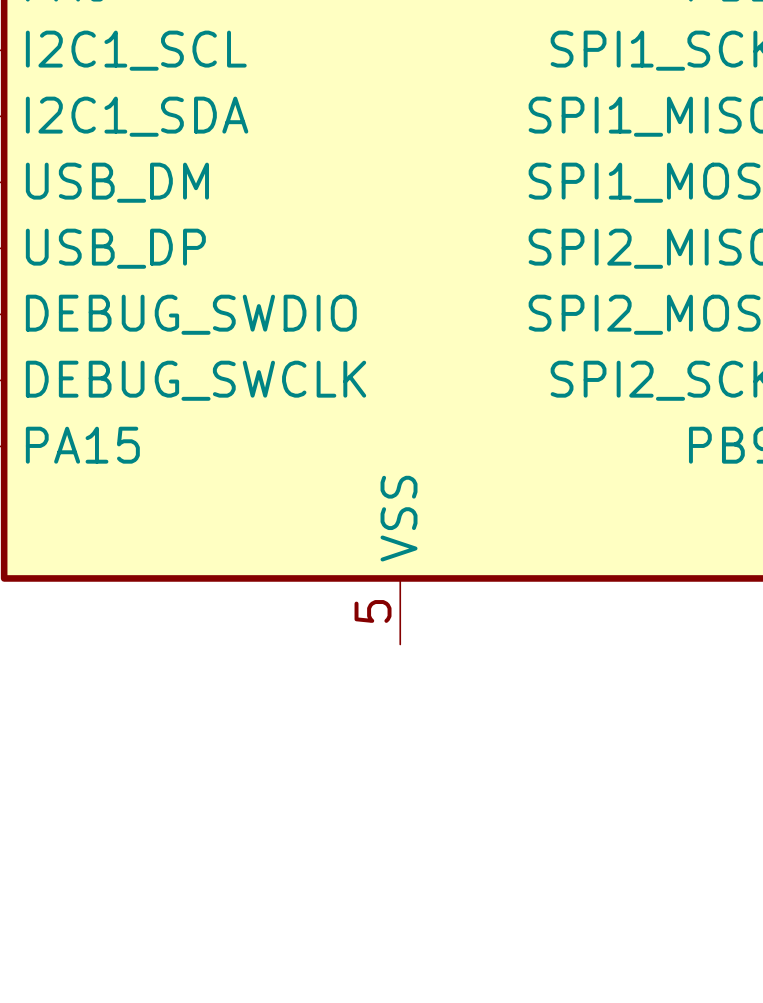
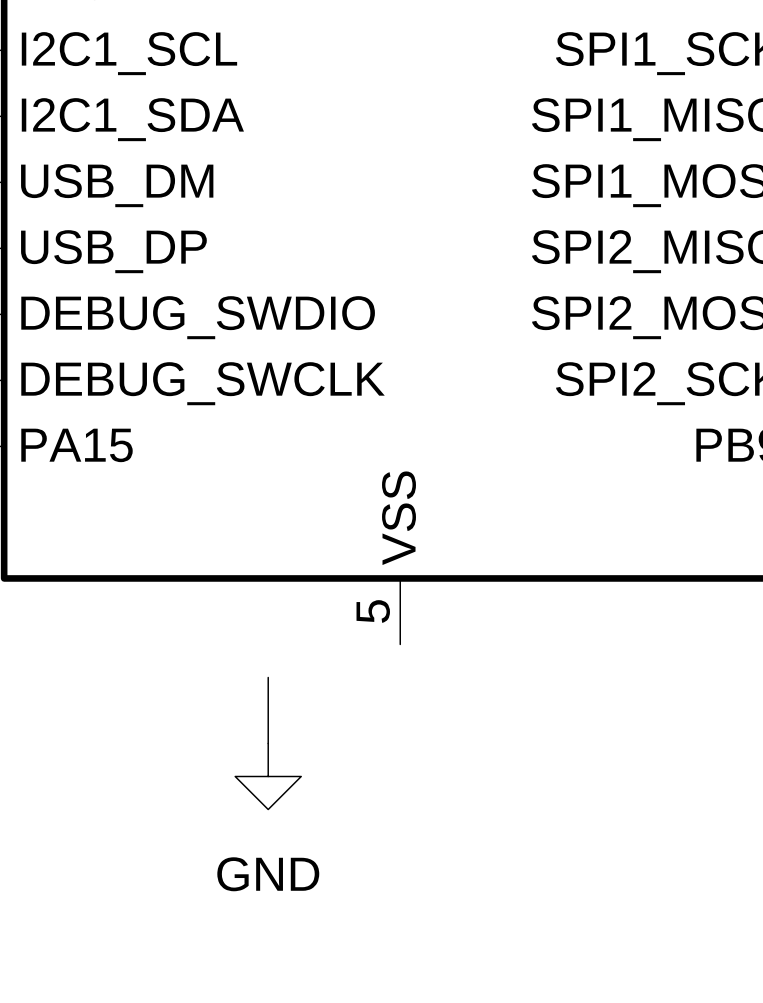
wire: none -> (268, 677) (268, 743)
power symbol: none -> GND (268, 776)

